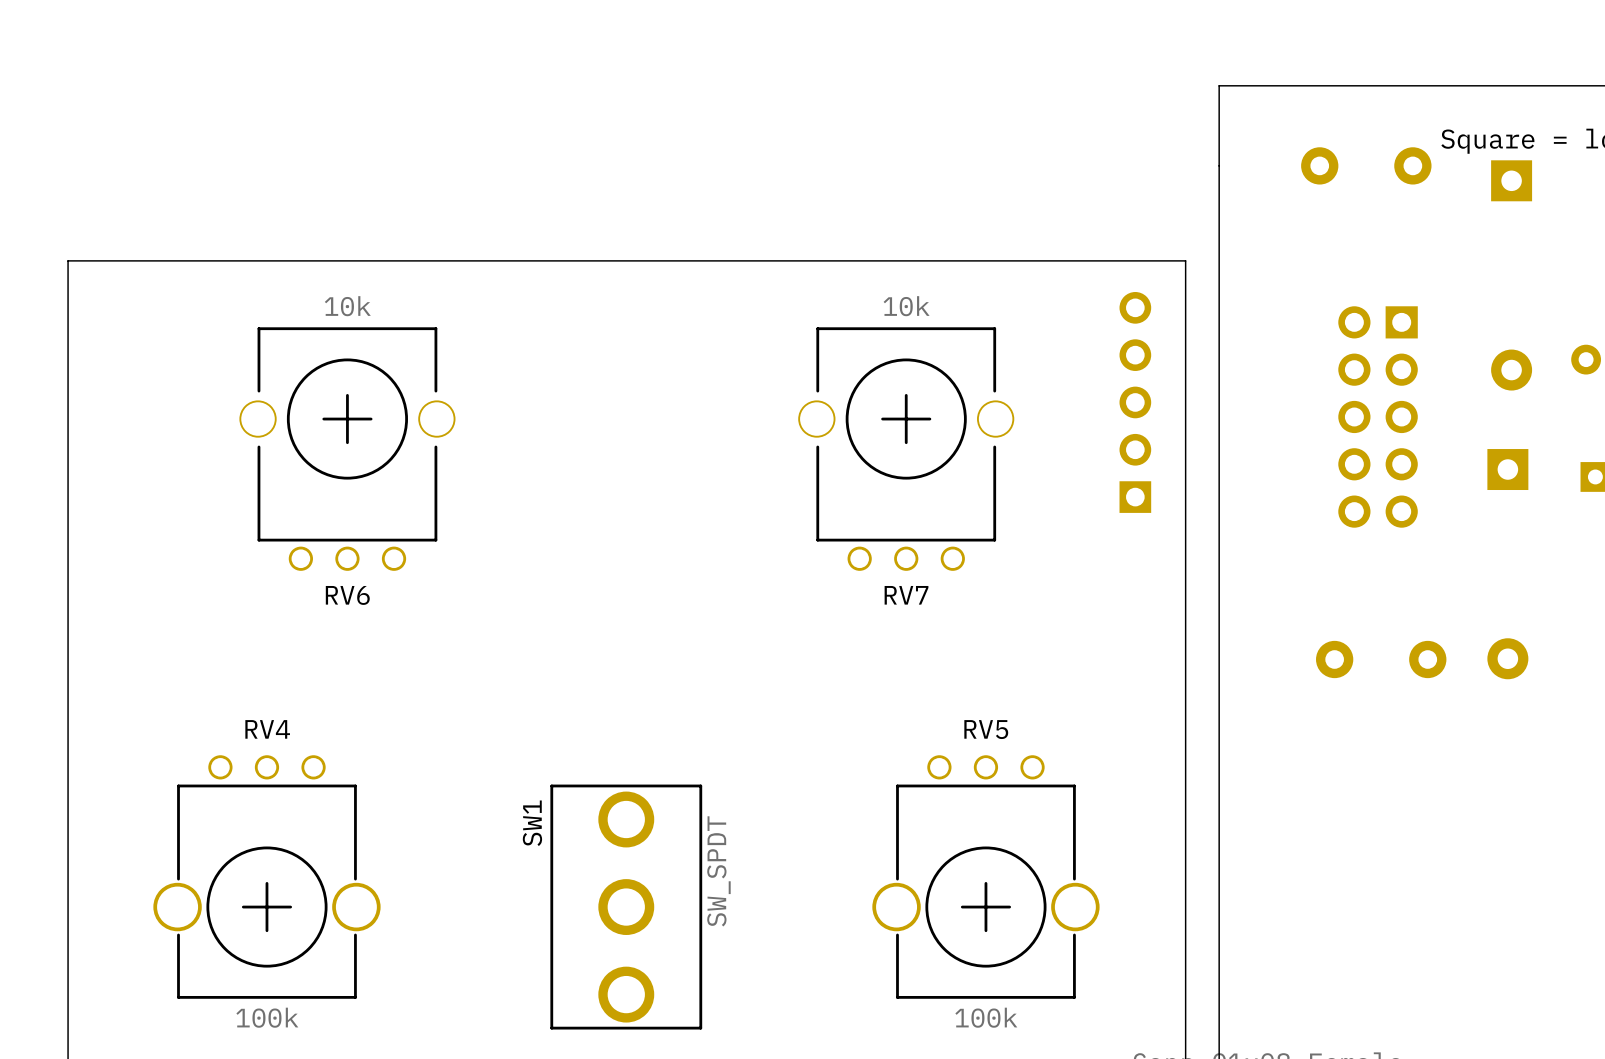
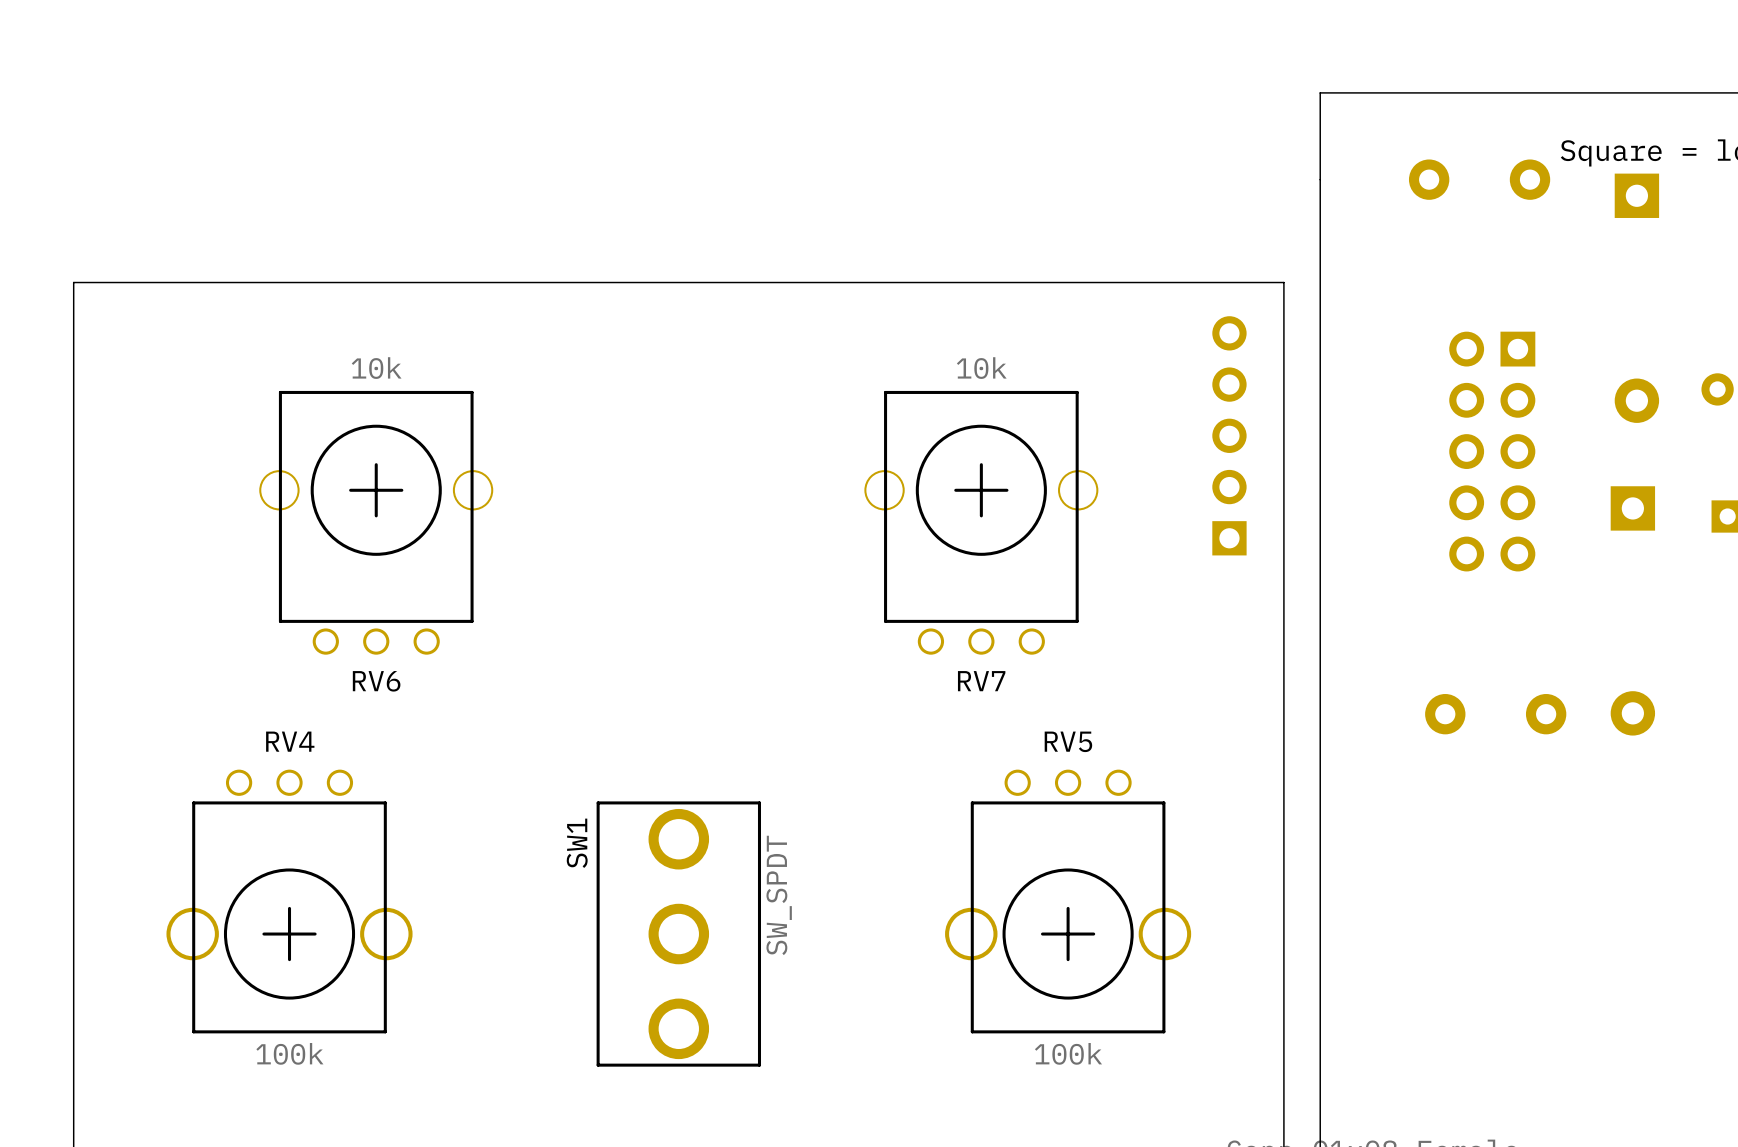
RV6 footprint: [239, 327, 456, 571] -> [259, 390, 494, 655]
RV7 footprint: [798, 327, 1015, 571] -> [864, 390, 1099, 655]
RV4 footprint: [153, 755, 381, 999] -> [166, 769, 413, 1034]
RV5 footprint: [872, 755, 1100, 999] -> [945, 769, 1192, 1034]
SW1 position: (626, 907) -> (678, 934)

